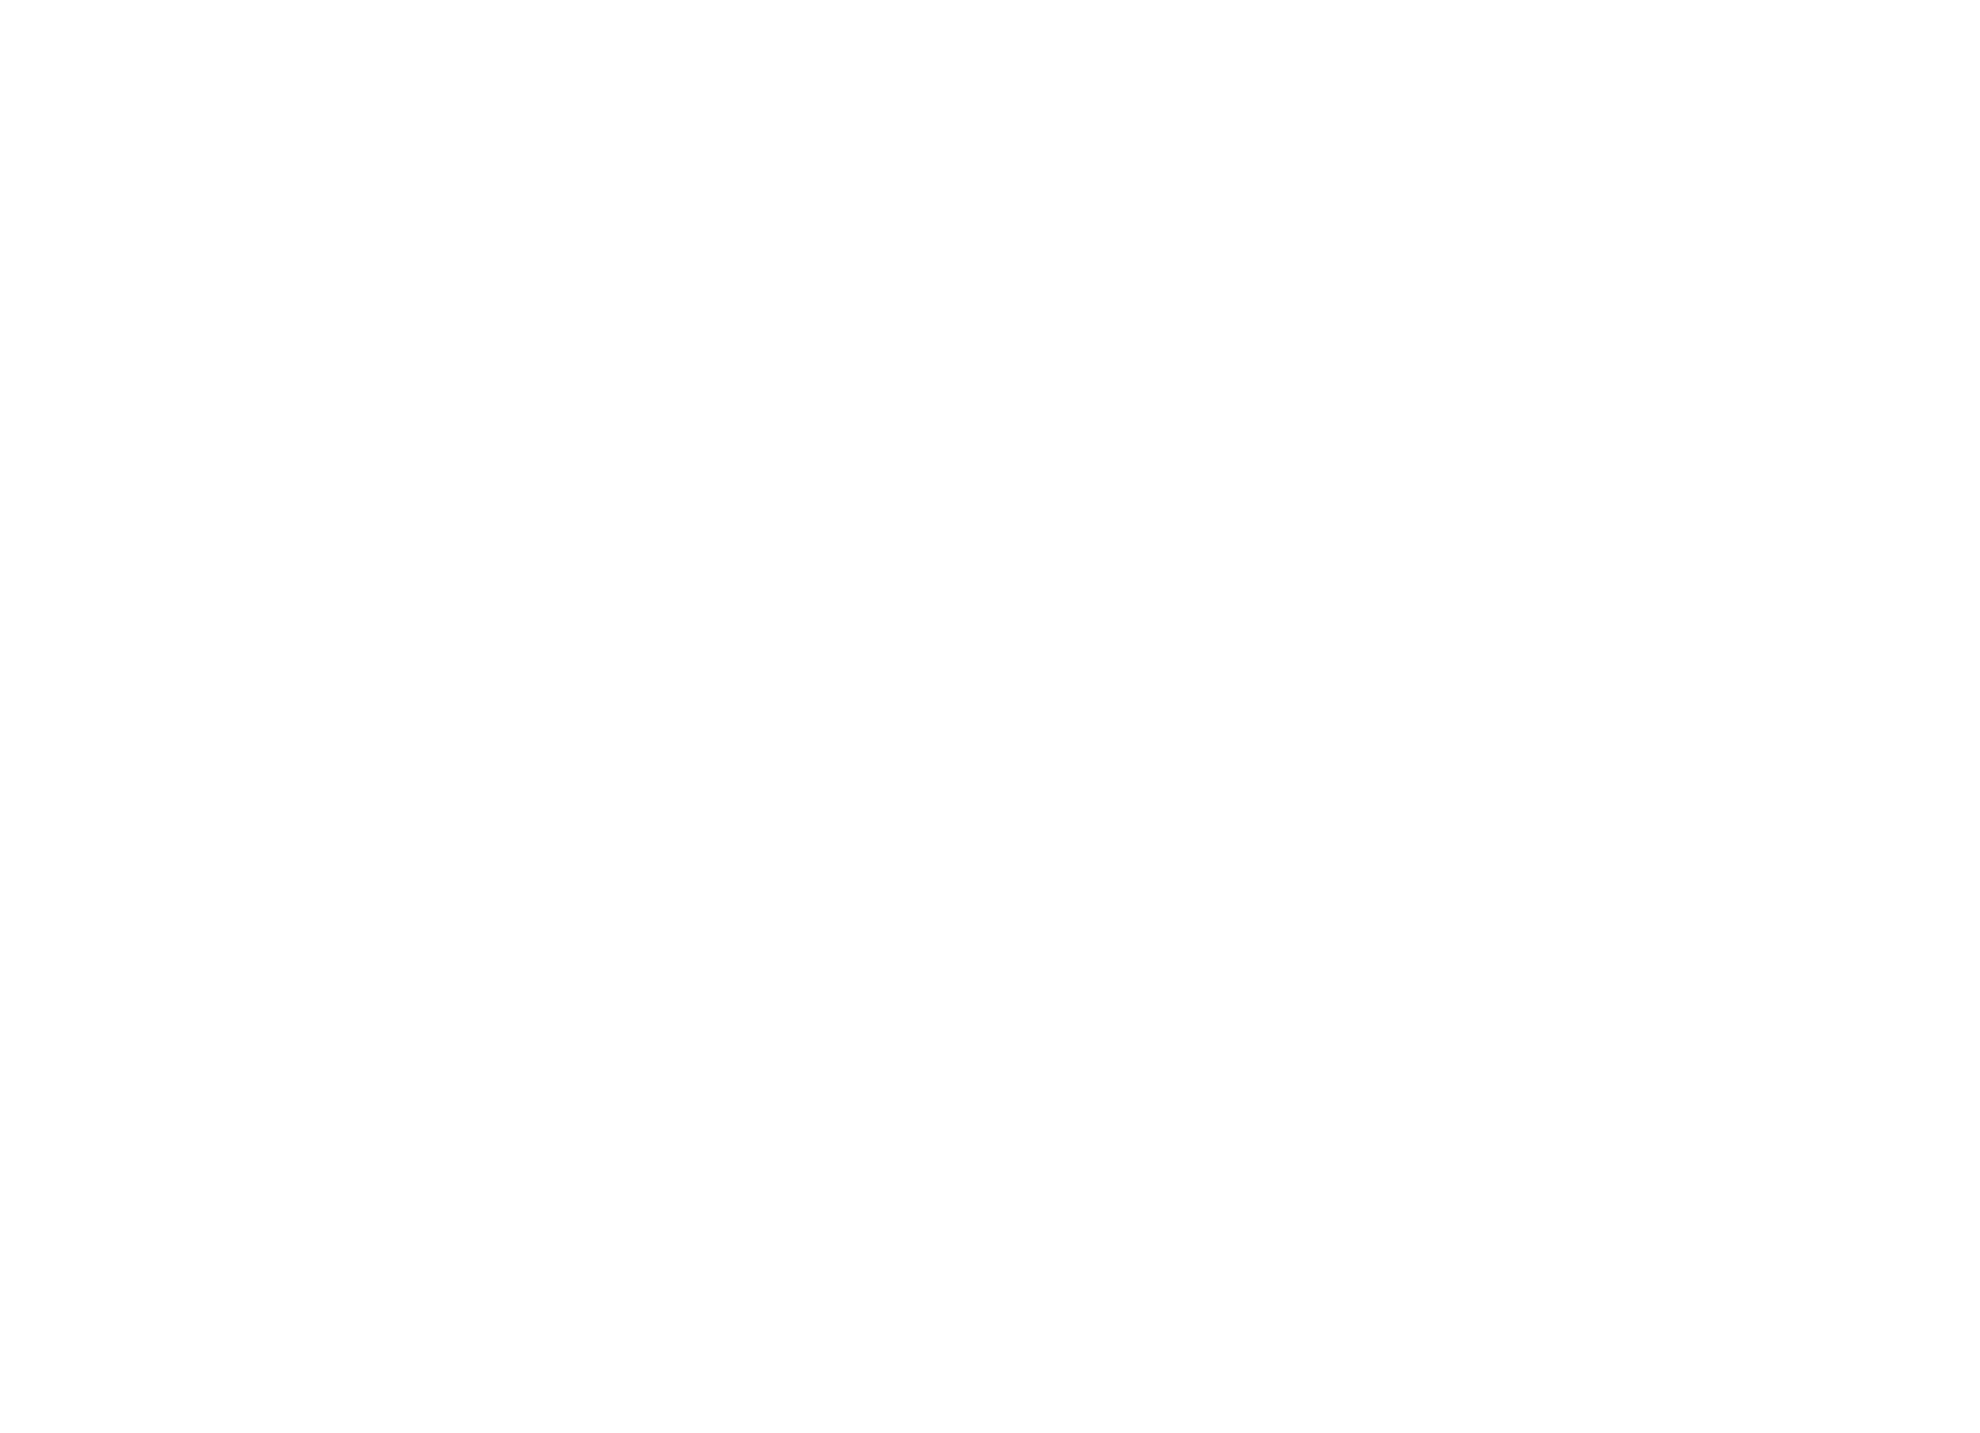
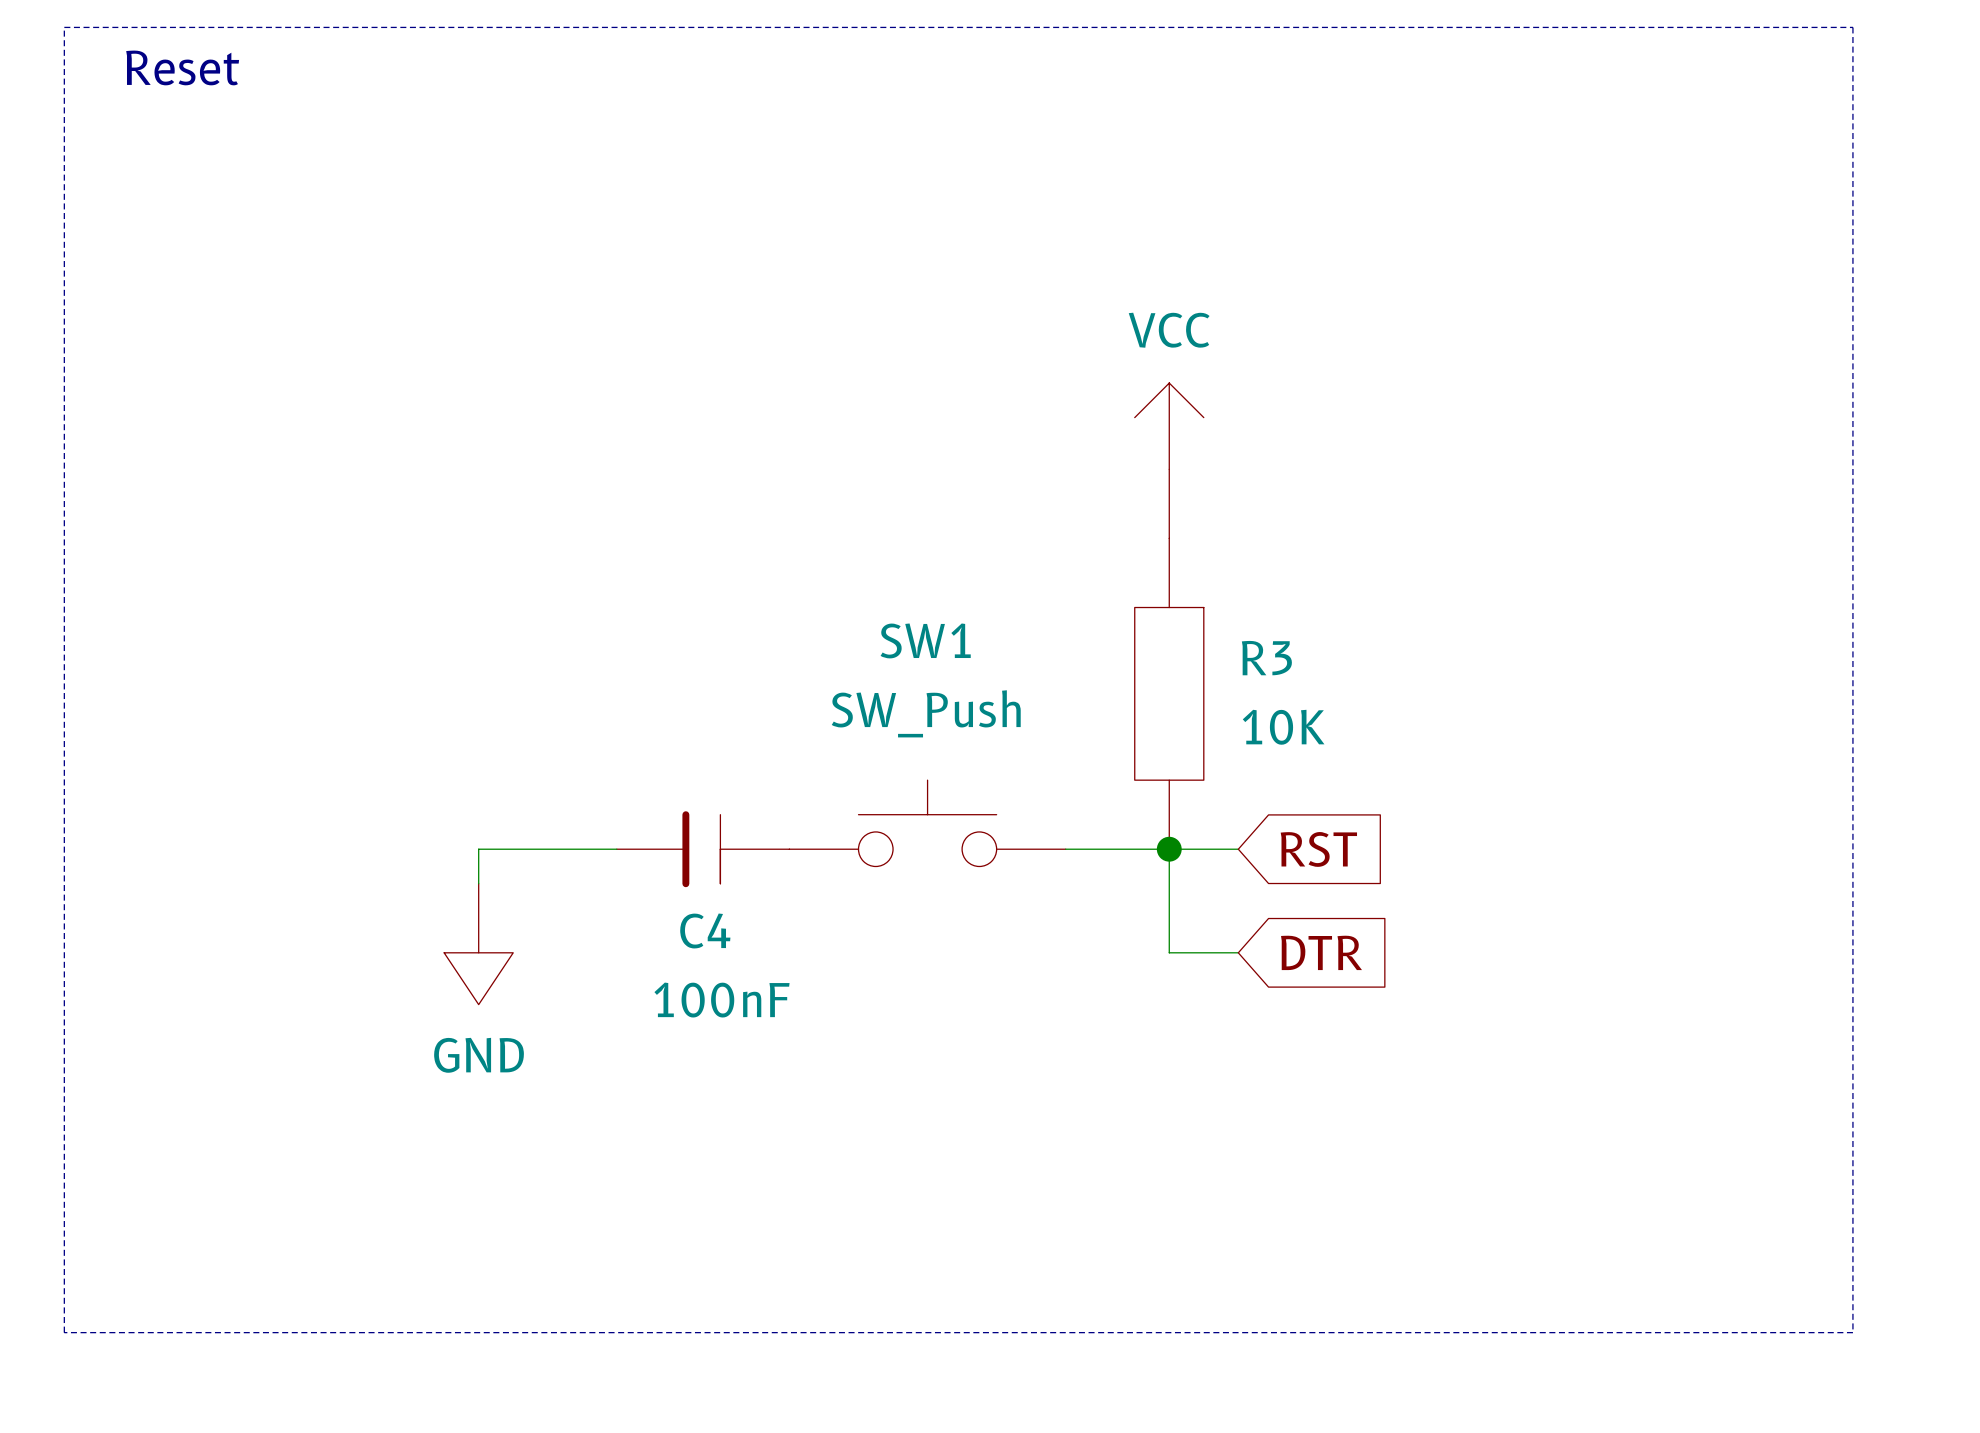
line: none -> (64, 27) (1852, 27) (1852, 1332) (64, 1332) (64, 27)
text: none -> Reset (182, 67)
power symbol: none -> VCC (1169, 460)
R3: none -> 10K (1169, 693)
SW1: none -> SW_Push (927, 814)
wire: none -> (616, 849) (478, 849) (478, 883)
wire: none -> (1065, 849) (1238, 849)
wire: none -> (1169, 849) (1169, 952) (1238, 952)
junction: none -> (1169, 849)
global label: none -> RST (1318, 849)
C4: none -> 100nF (703, 882)
power symbol: none -> GND (478, 944)
global label: none -> DTR (1321, 952)

